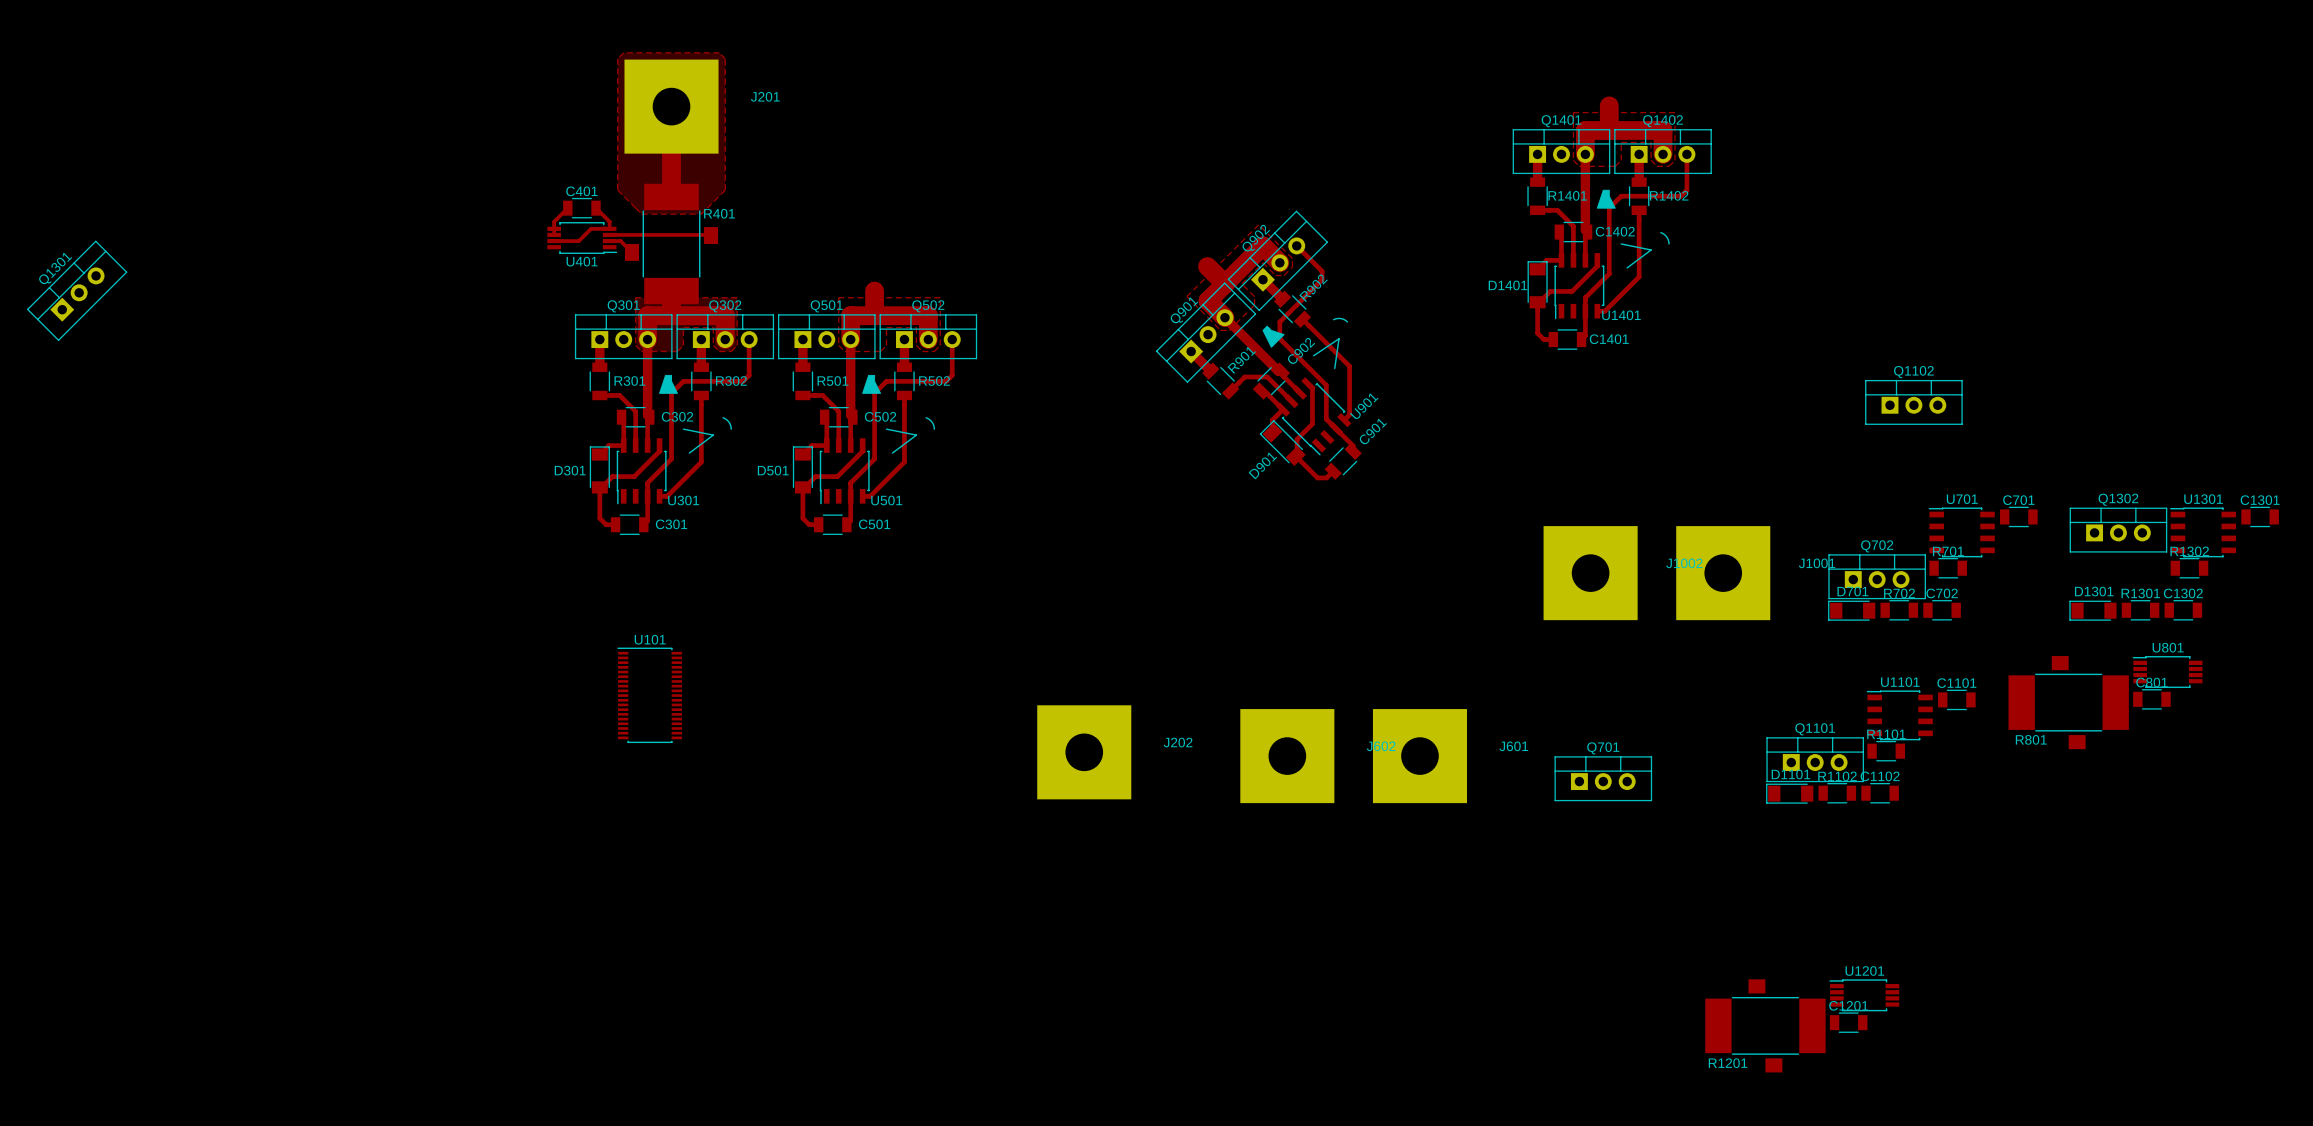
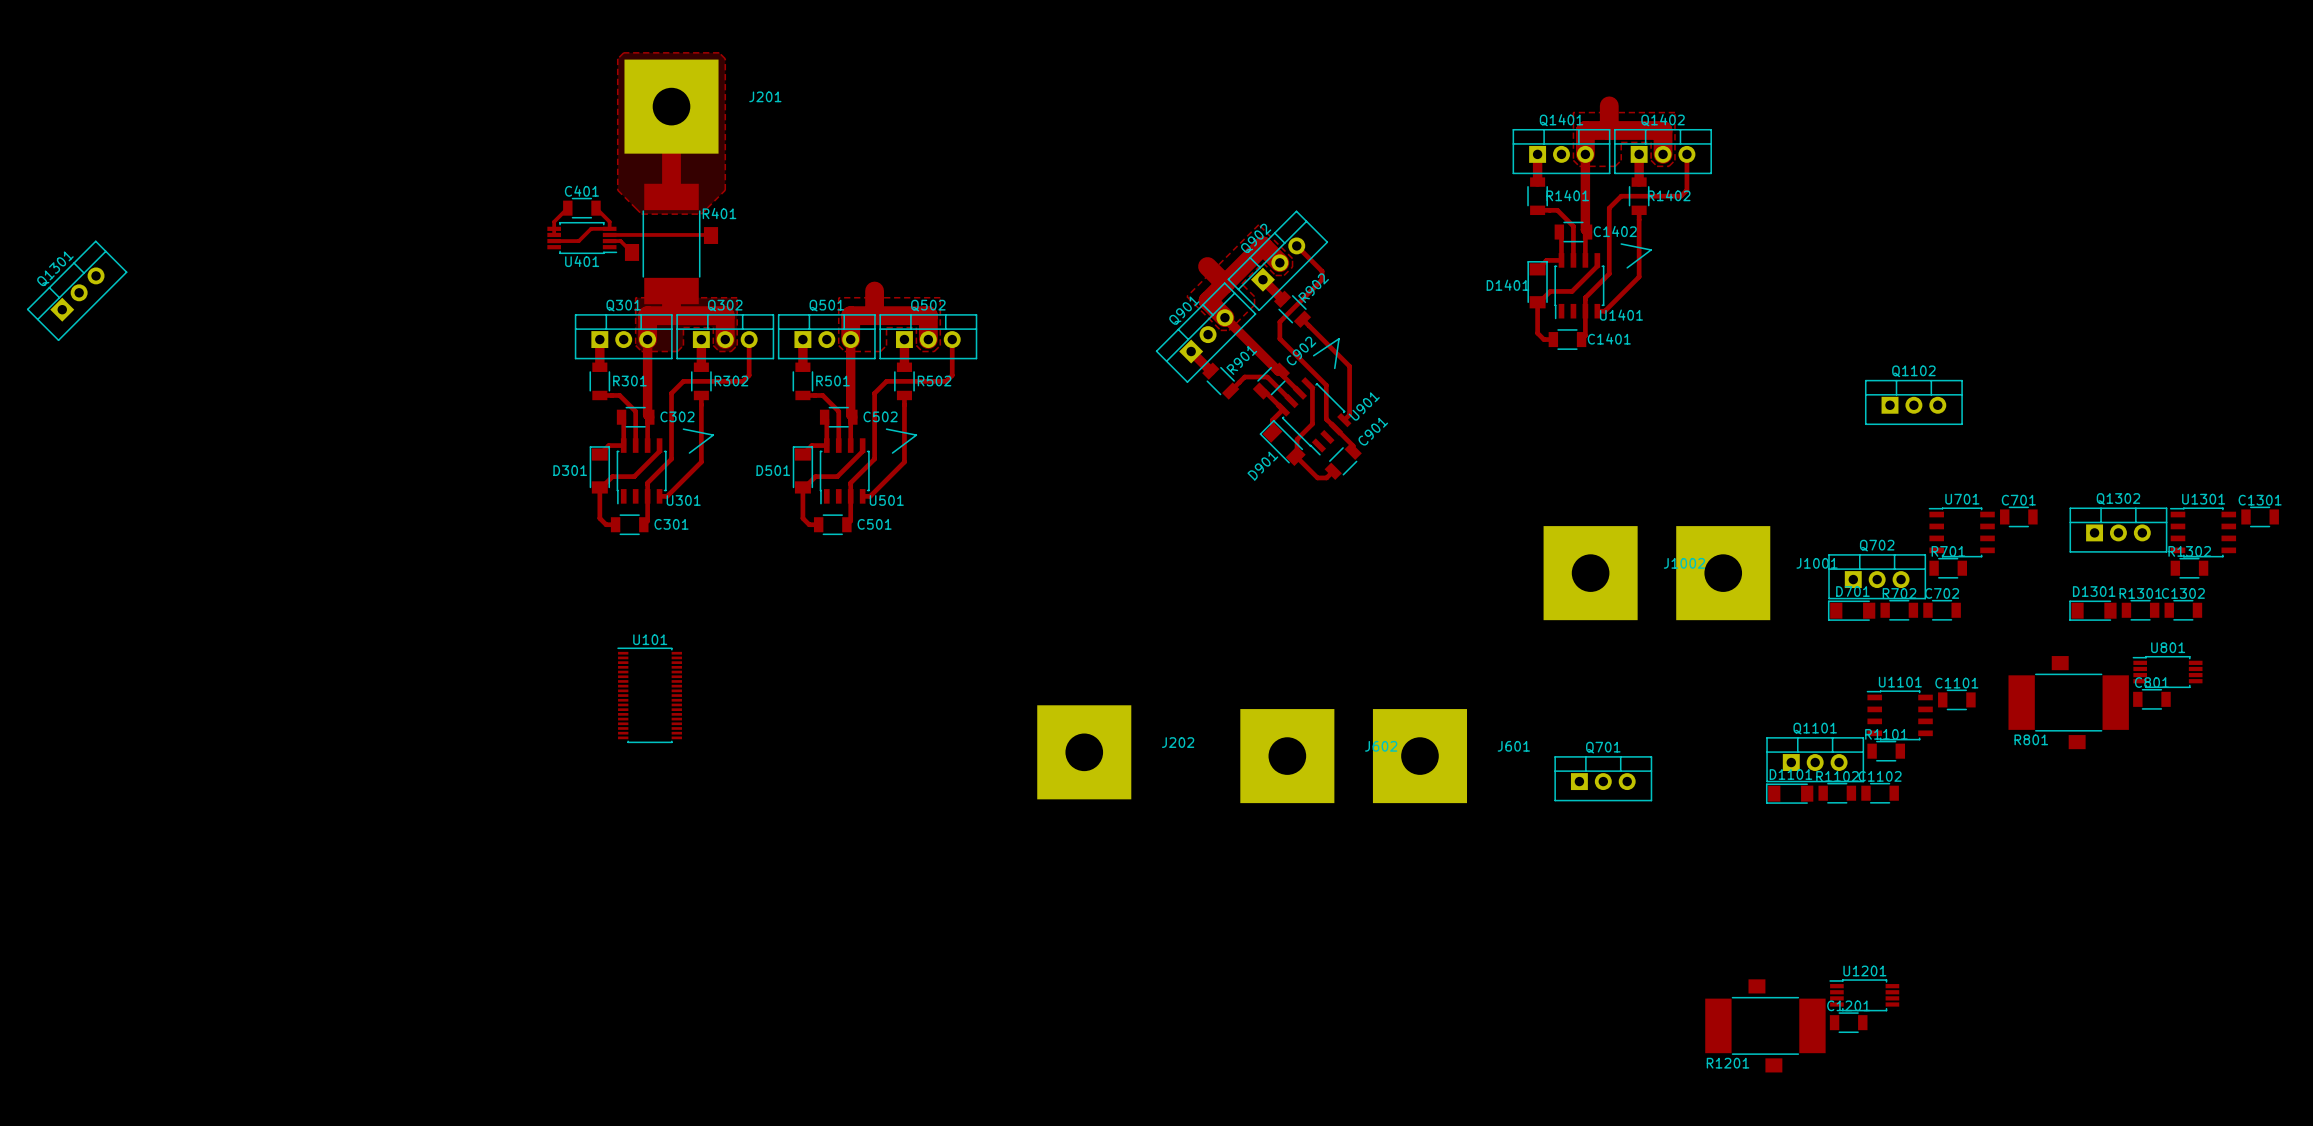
drawing: [1596, 189, 1616, 209] -> none
line: (1660, 232) (1666, 237) (1669, 243) -> none
line: (1333, 319) (1340, 318) (1347, 321) -> none
drawing: [1262, 325, 1285, 348] -> none
drawing: [659, 374, 678, 394] -> none
drawing: [862, 374, 882, 394] -> none
line: (723, 417) (728, 422) (731, 429) -> none
line: (926, 417) (932, 422) (934, 429) -> none

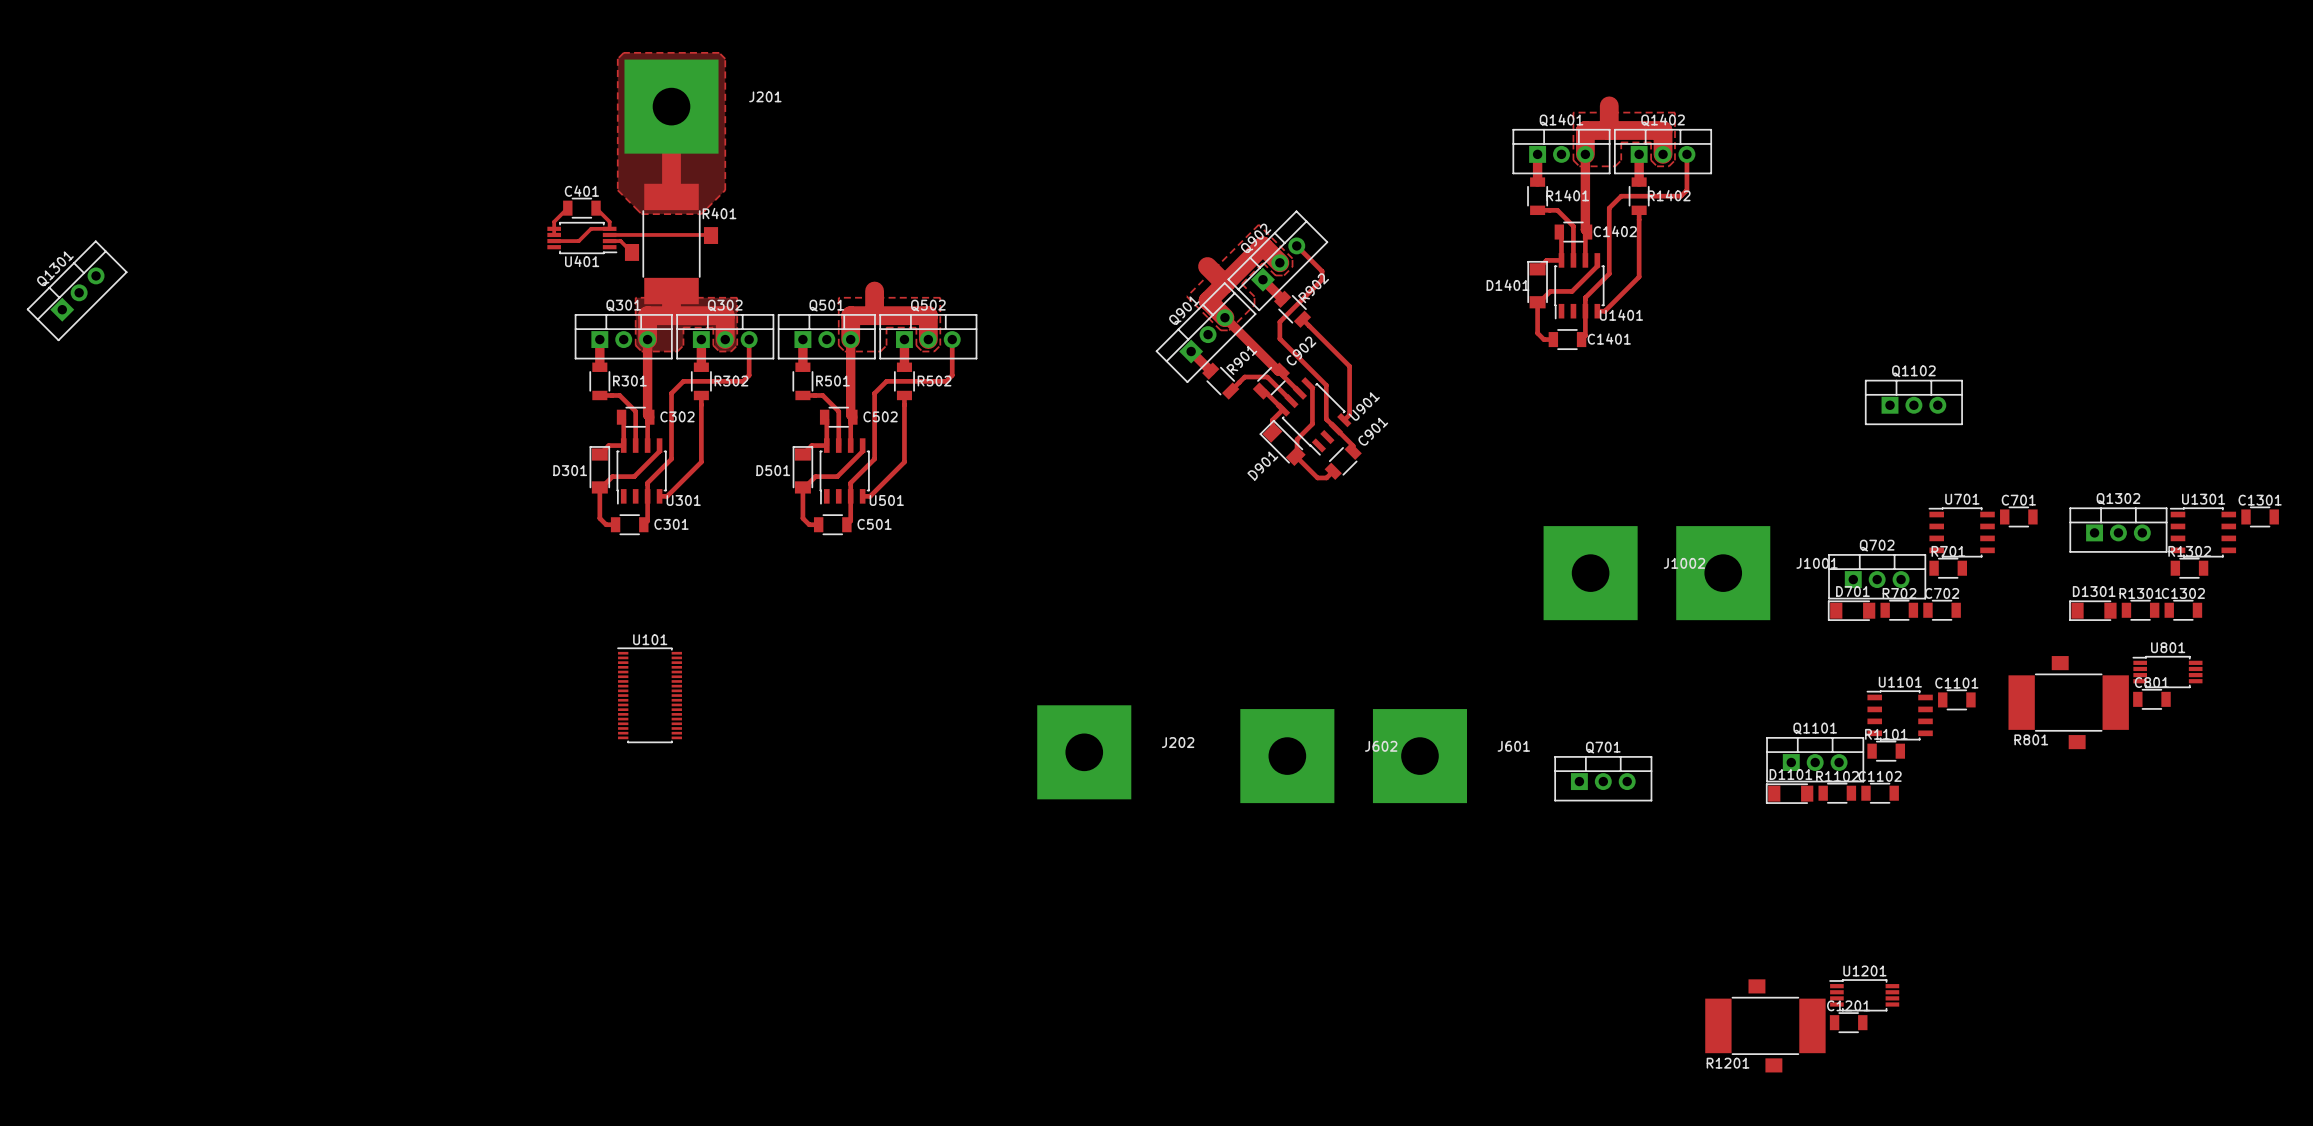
line: (1621, 243) (1651, 249) (1627, 267) -> none
line: (1313, 355) (1338, 338) (1334, 368) -> none
line: (683, 429) (713, 435) (689, 453) -> none
line: (886, 429) (916, 435) (892, 453) -> none

